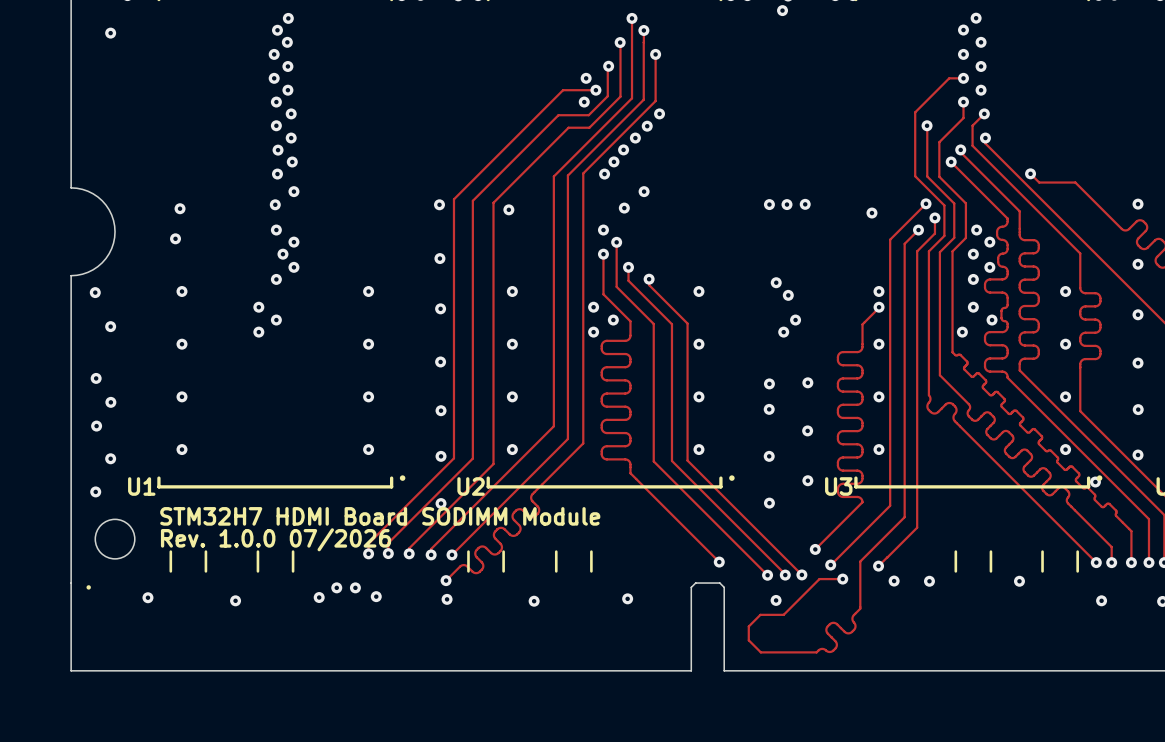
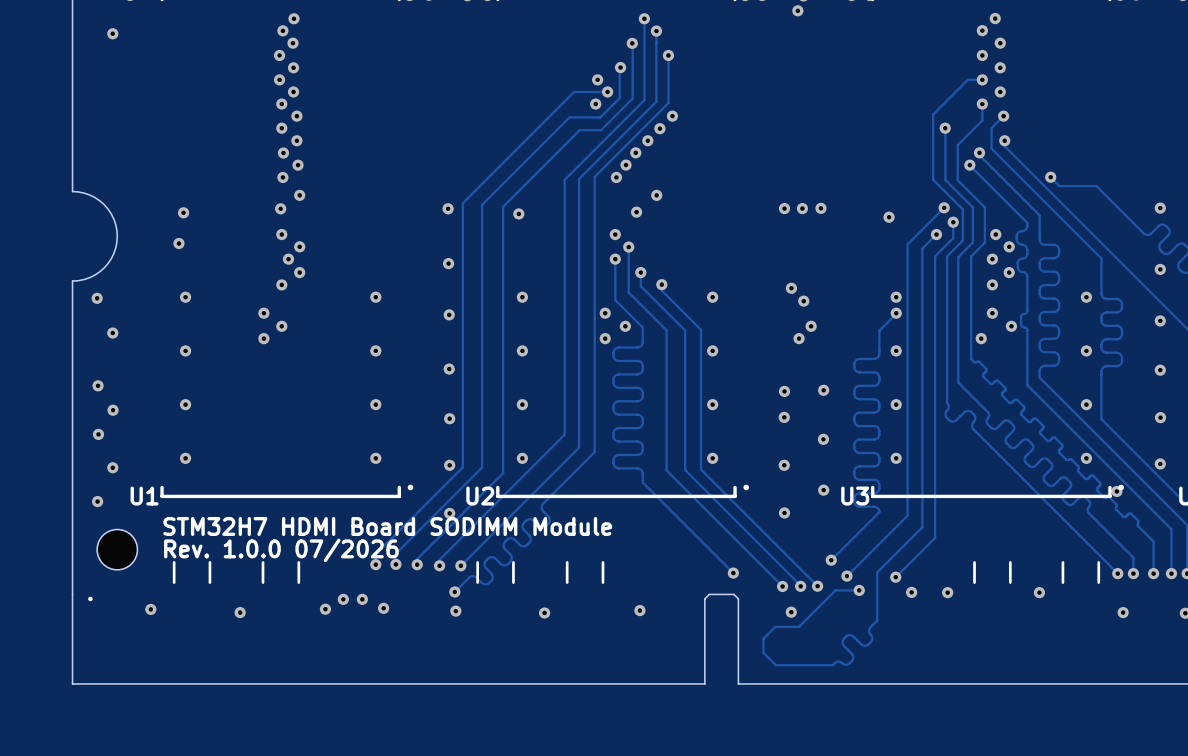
track: (1007, 274) (1004, 279) (987, 279) (985, 284) (987, 291) (1004, 292) (1007, 297) -> (1027, 279) (1027, 303)
track: (1007, 326) (1004, 331) (988, 332) (985, 337) (987, 344) (1004, 345) (1007, 350) -> (1027, 333) (1027, 357)
track: (1007, 353) (1004, 357) (988, 358) (985, 363) (987, 370) (1004, 371) (1007, 376) -> (1027, 360) (1027, 384)

